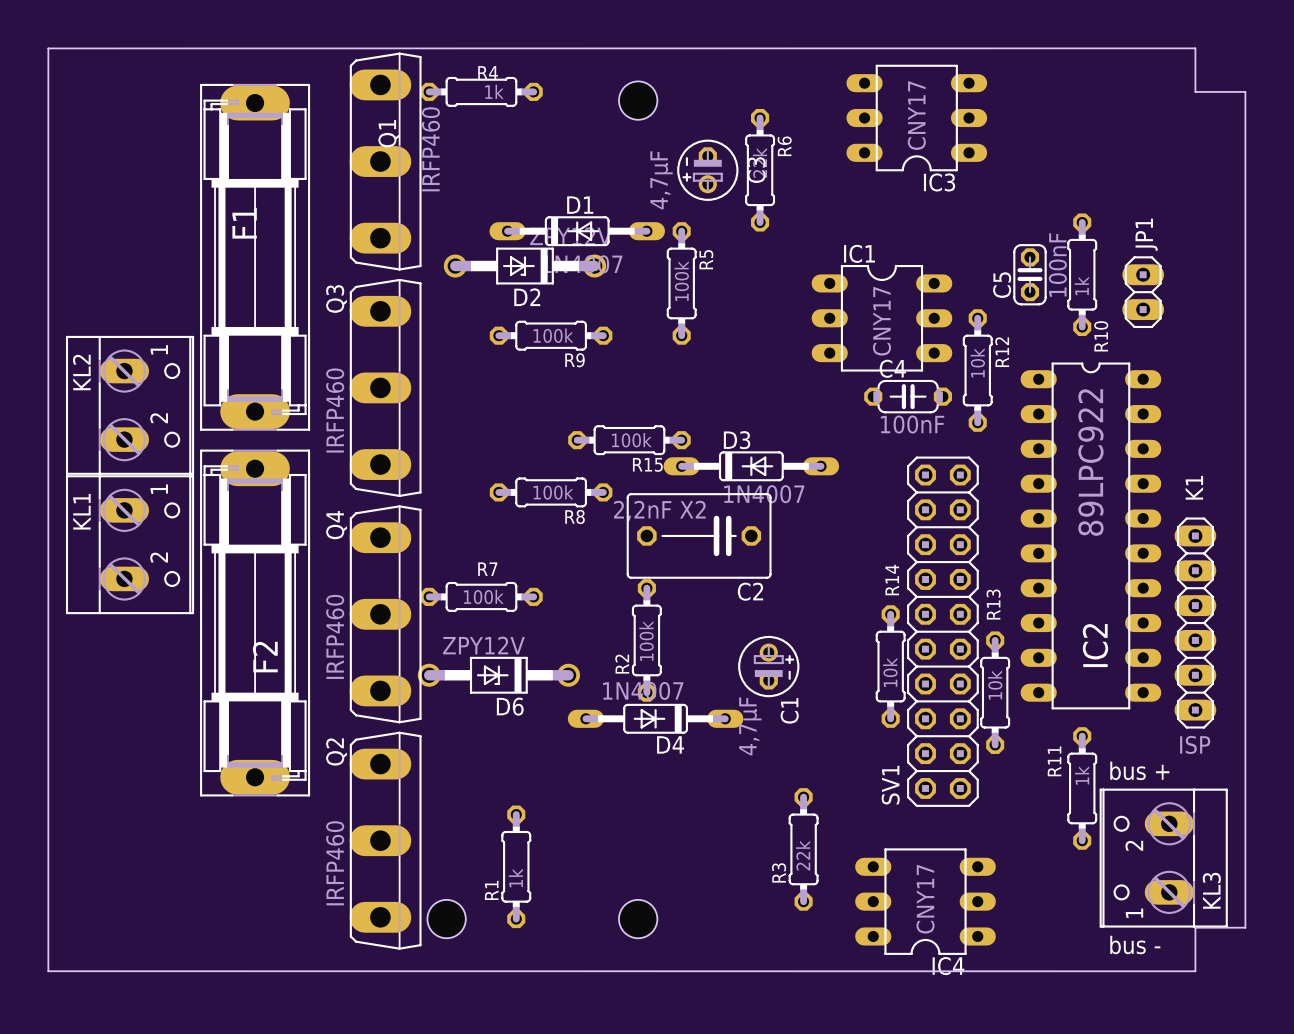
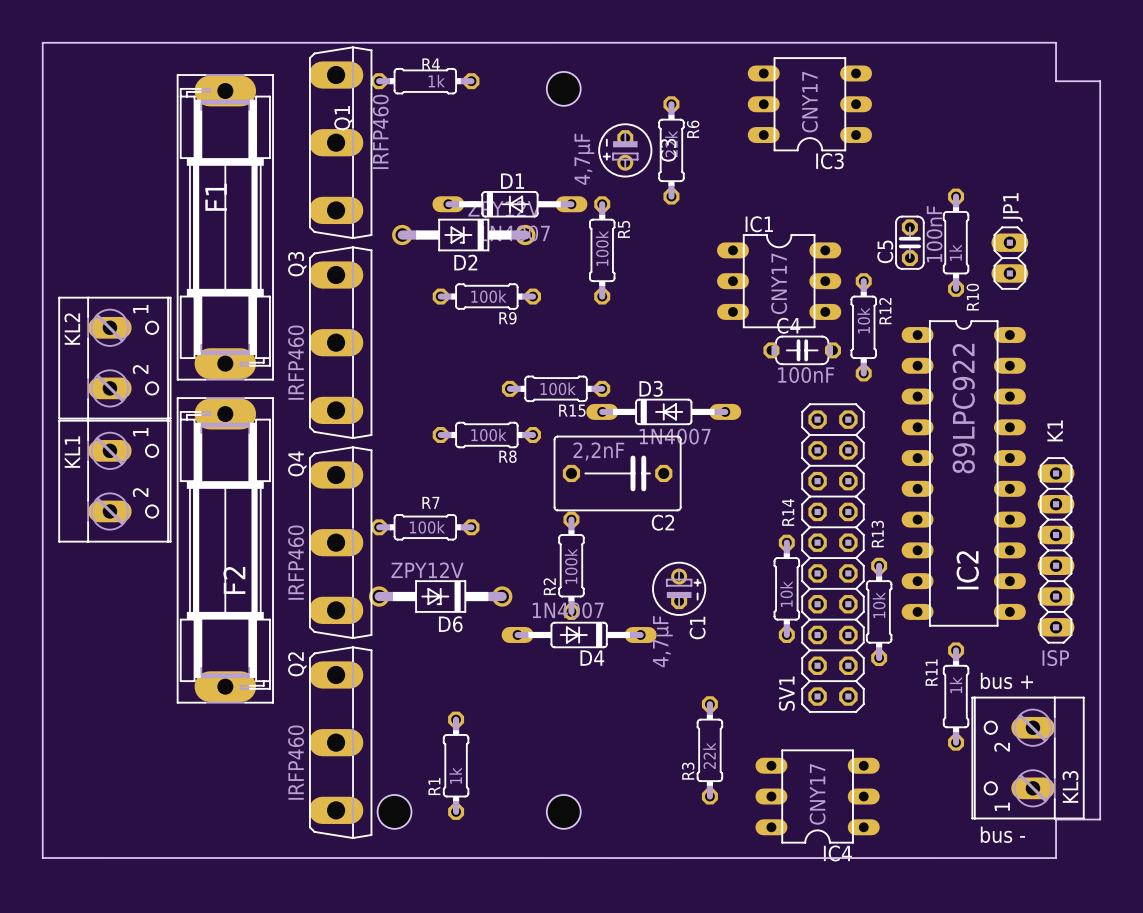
C2 value: 2,2nF X2 (659, 511) -> 2,2nF (598, 451)

